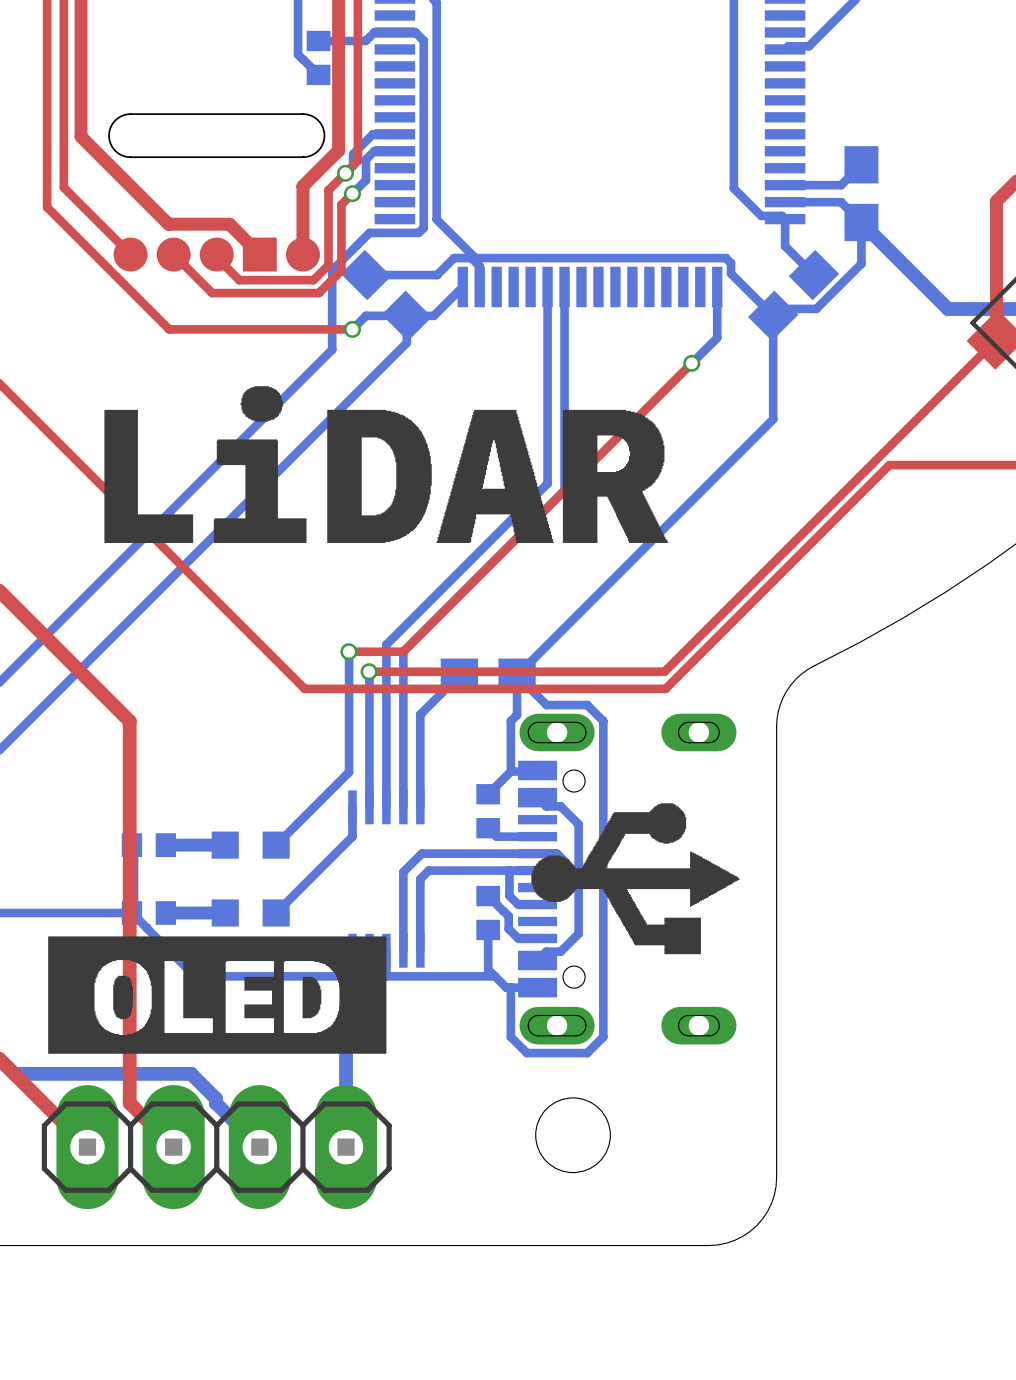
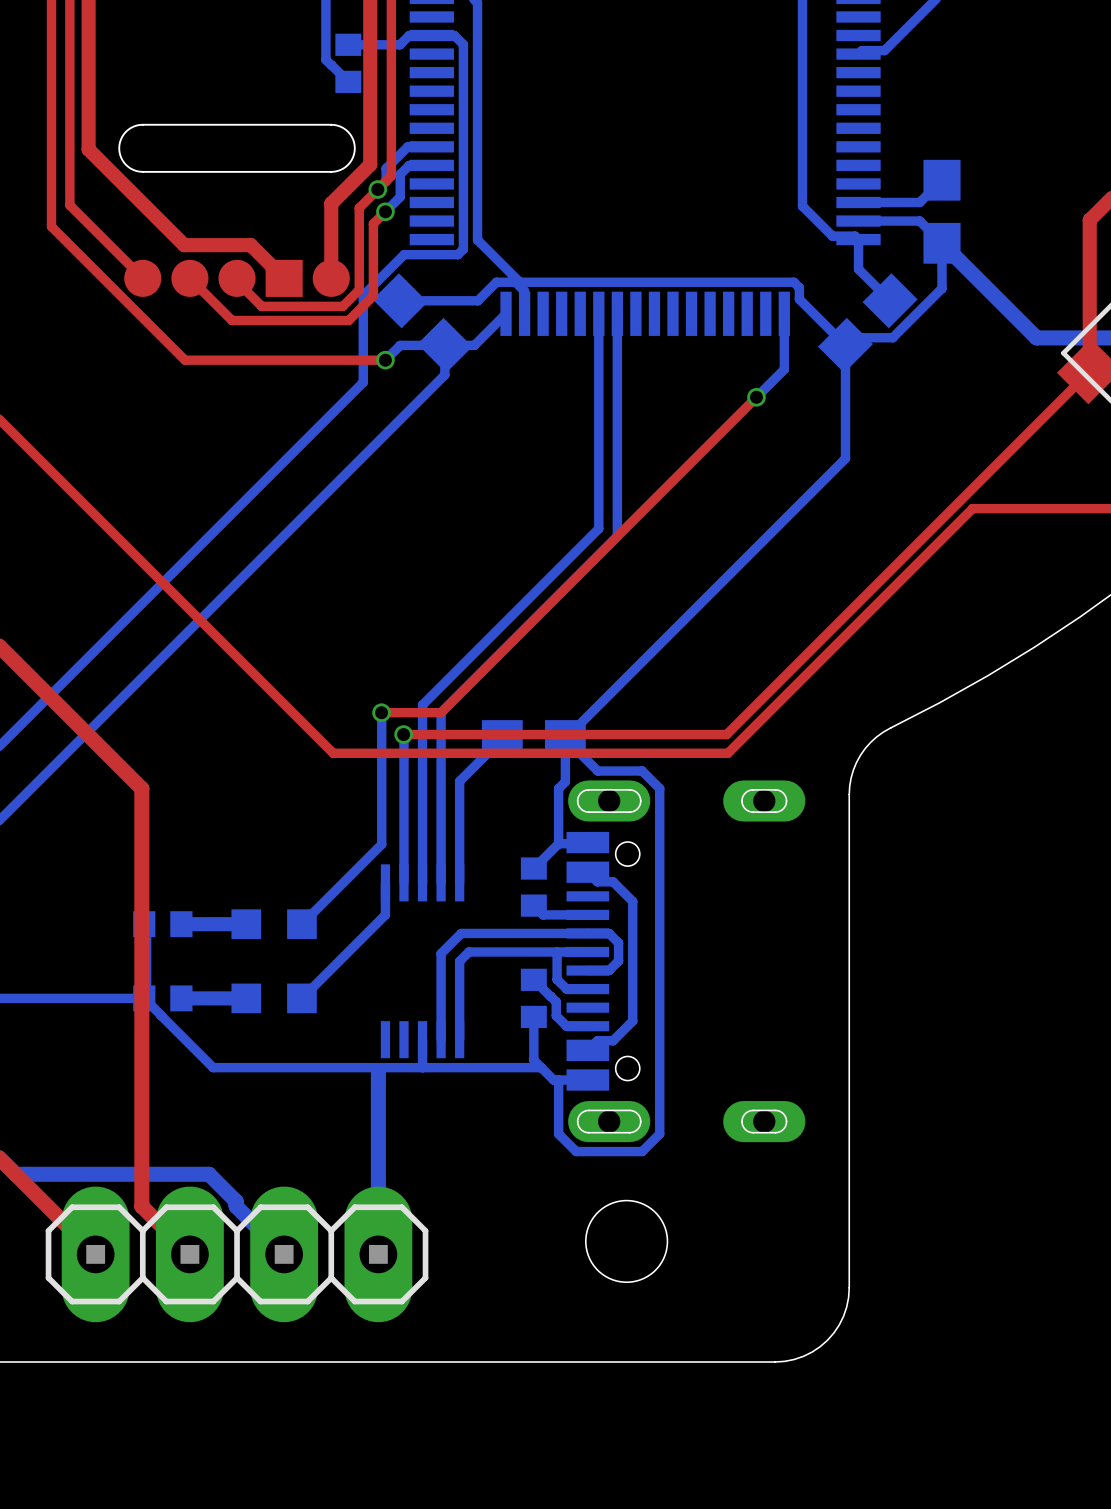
drawing: [104, 386, 669, 543] -> none
drawing: [531, 803, 740, 955] -> none
drawing: [48, 936, 387, 1054] -> none

